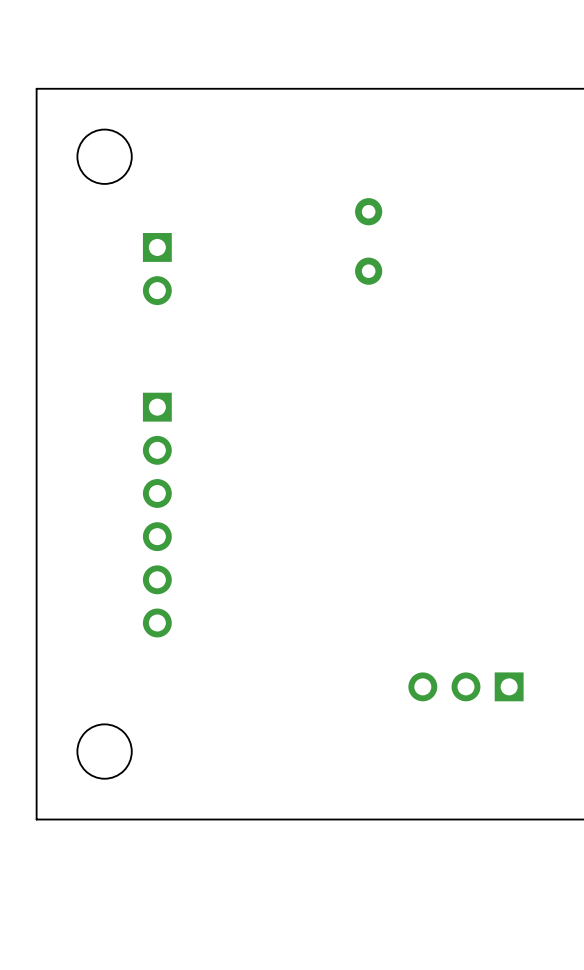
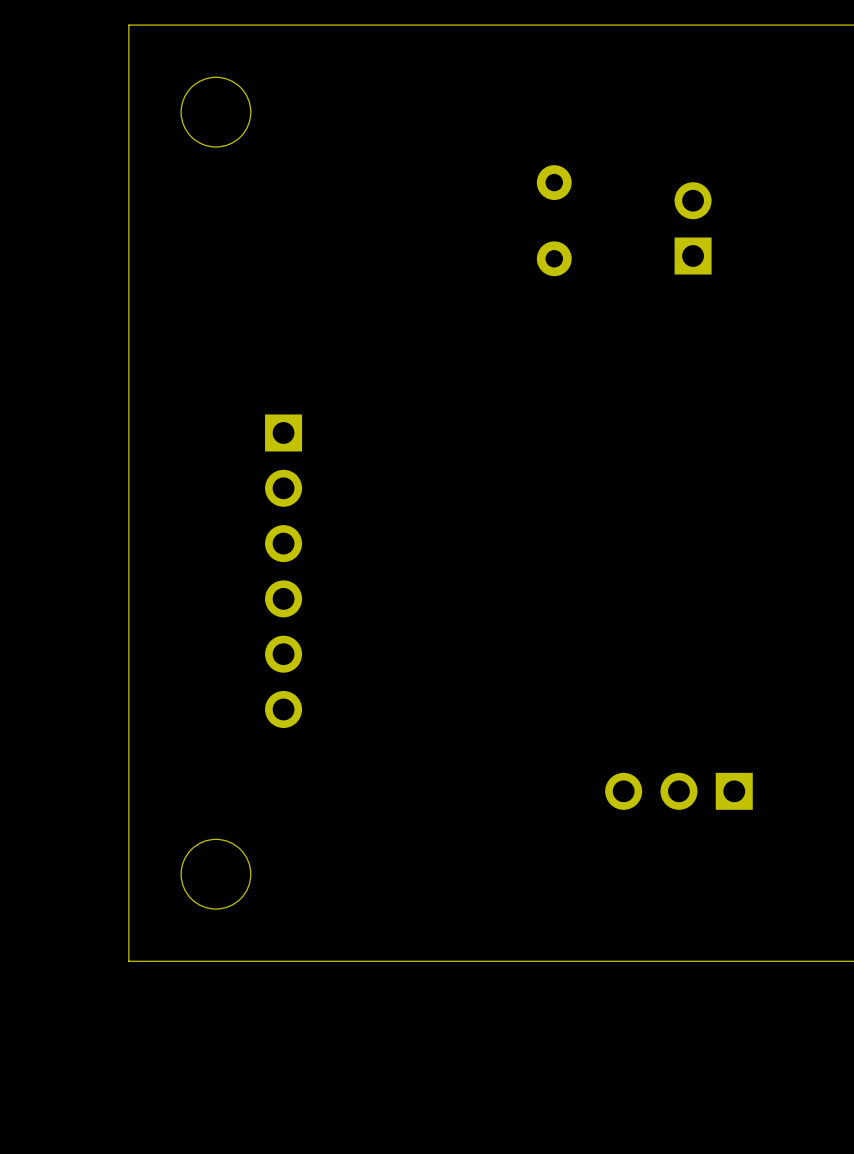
part rotation: 0° (157, 269) -> 180° (693, 228)
part position: (157, 269) -> (693, 228)

